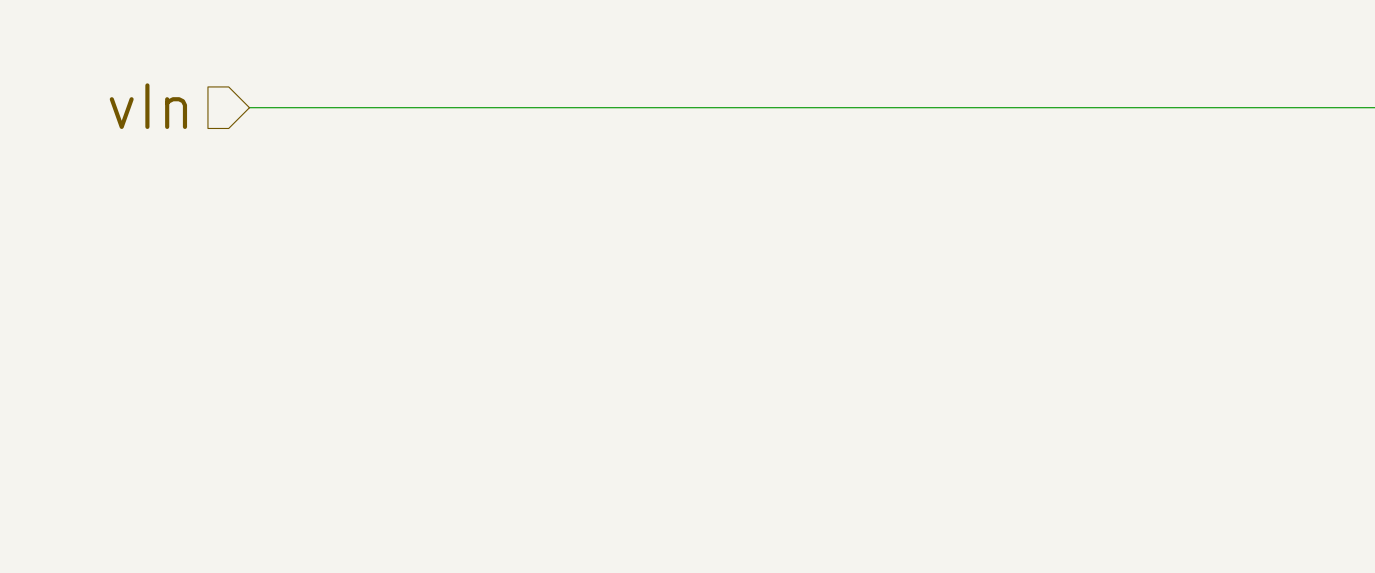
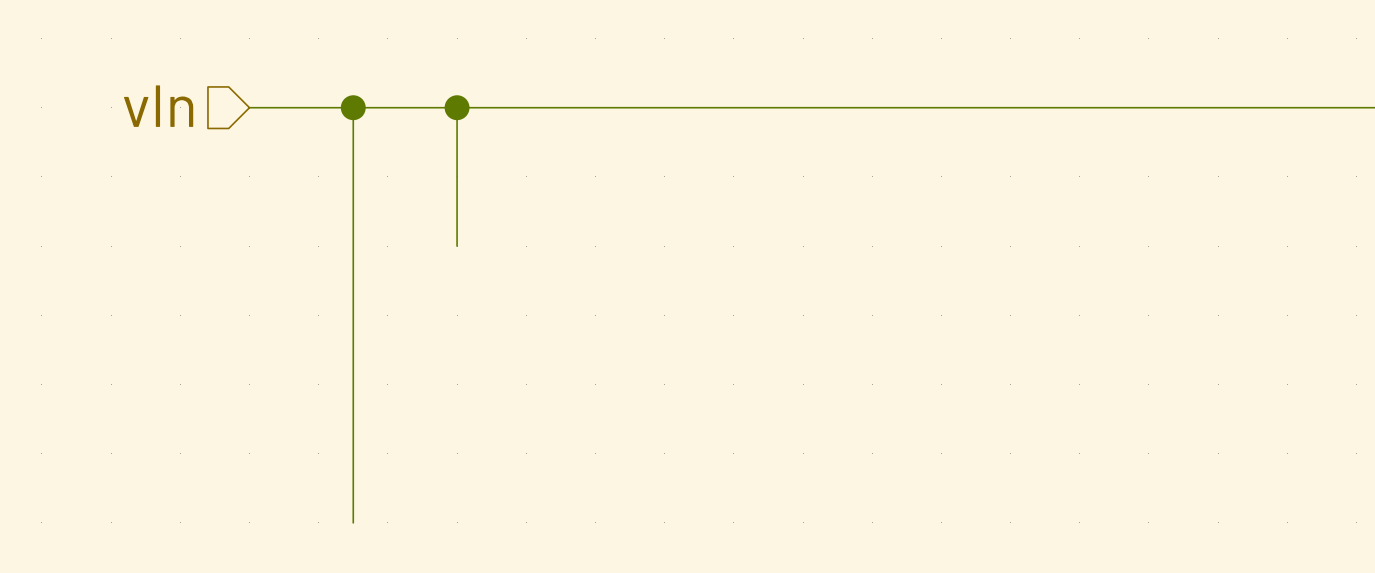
wire: none -> (353, 107) (353, 522)
junction: none -> (353, 107)
wire: none -> (457, 107) (457, 246)
junction: none -> (457, 107)

